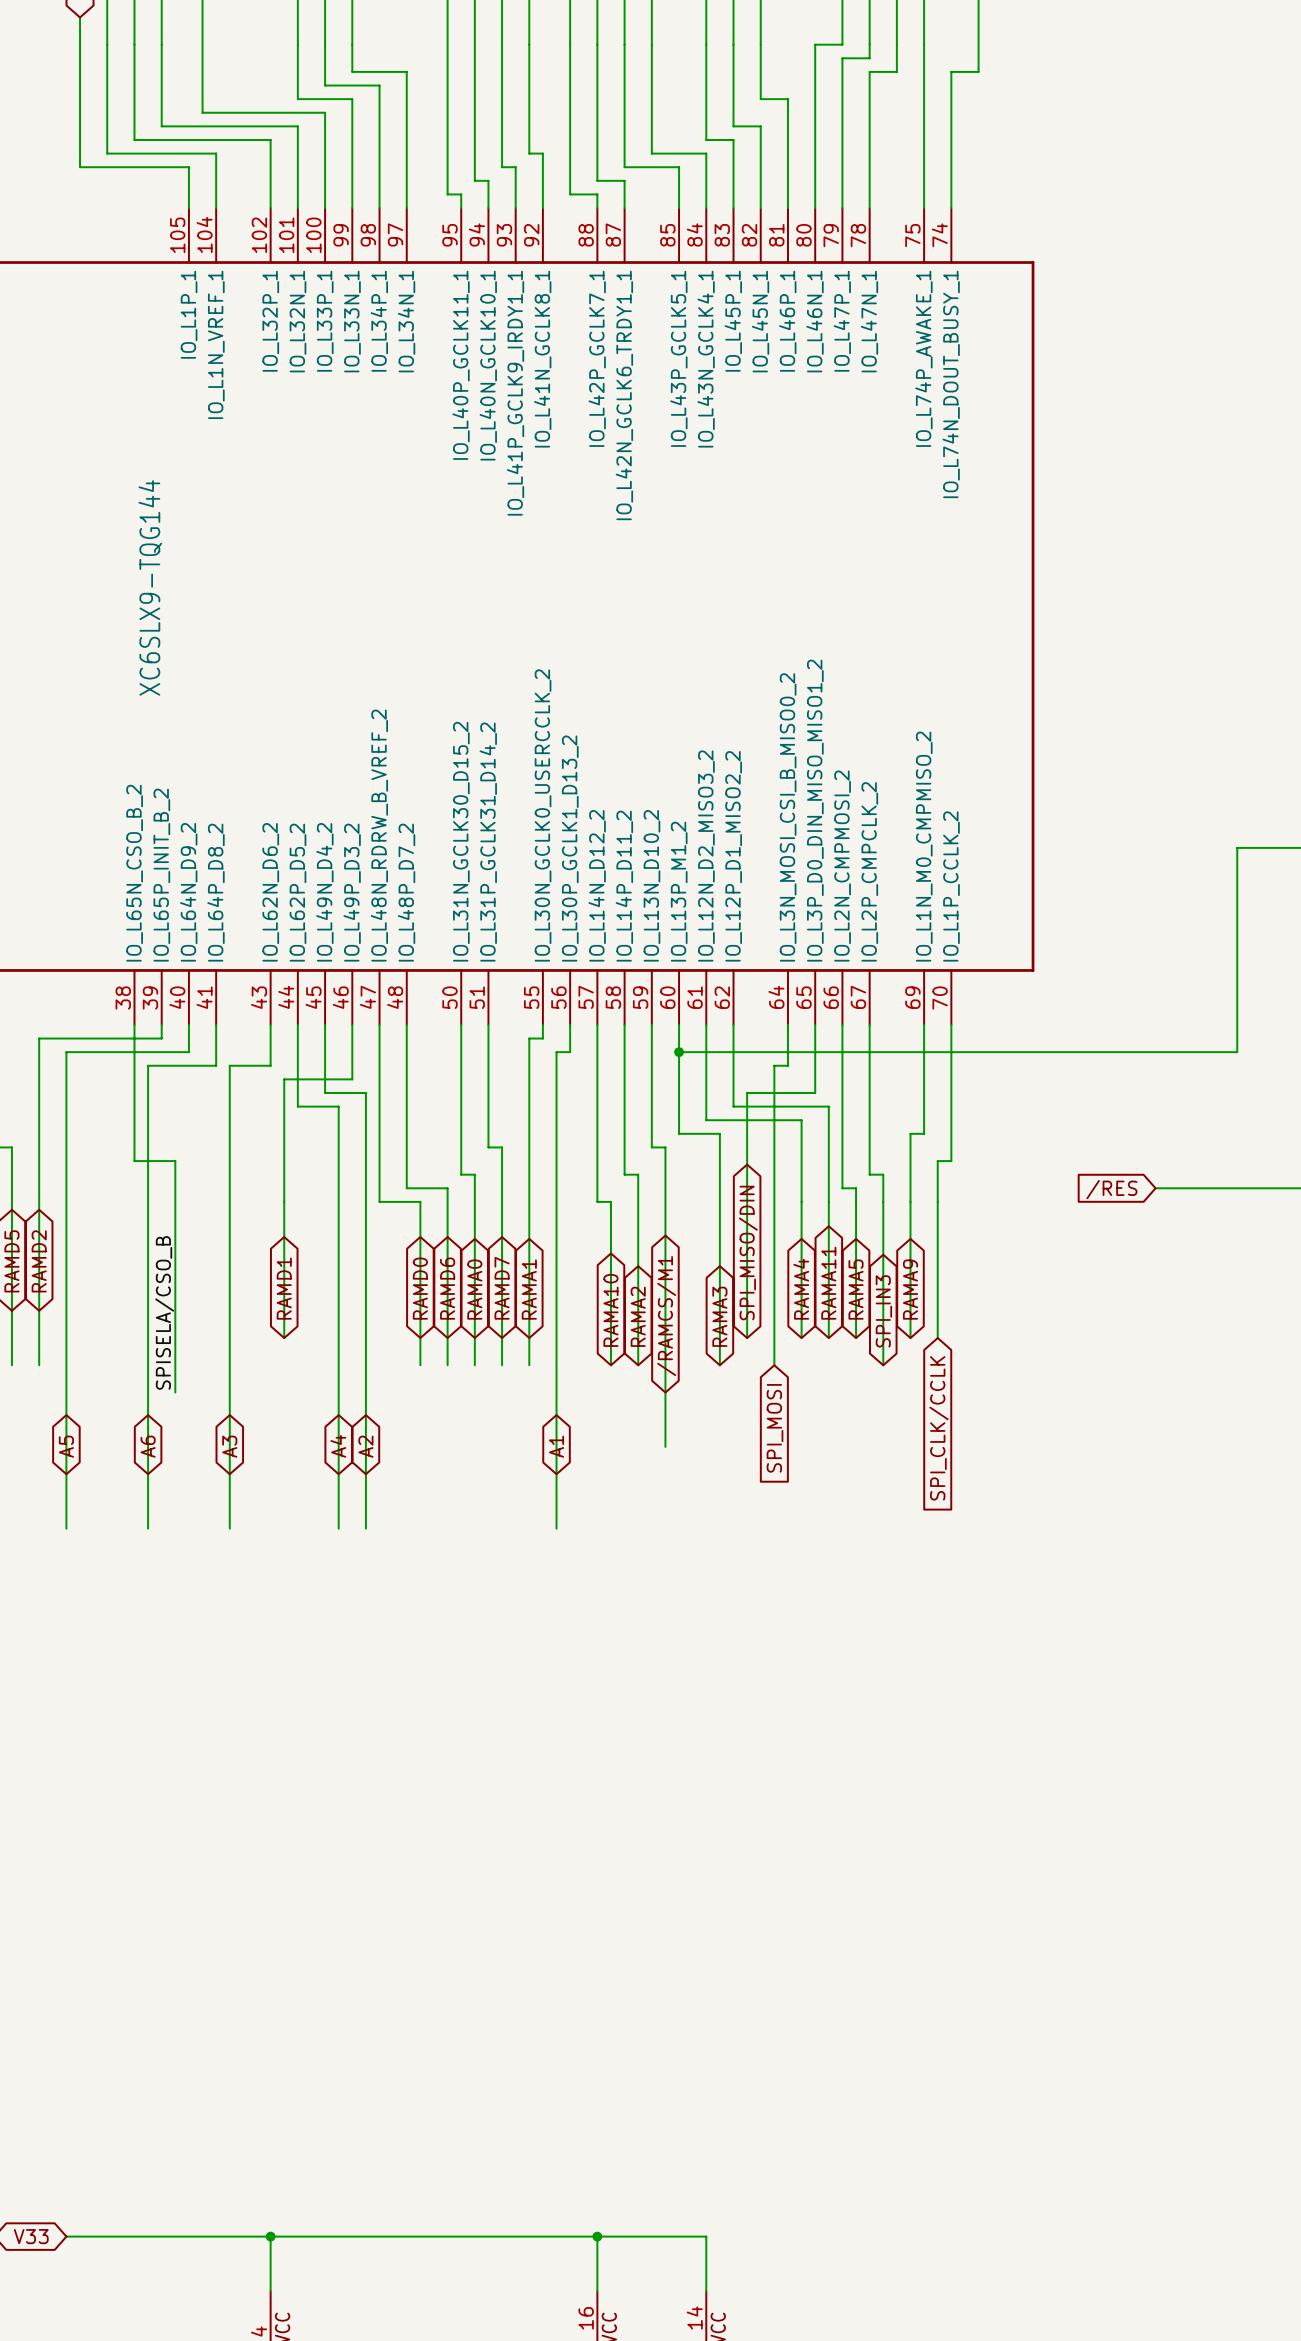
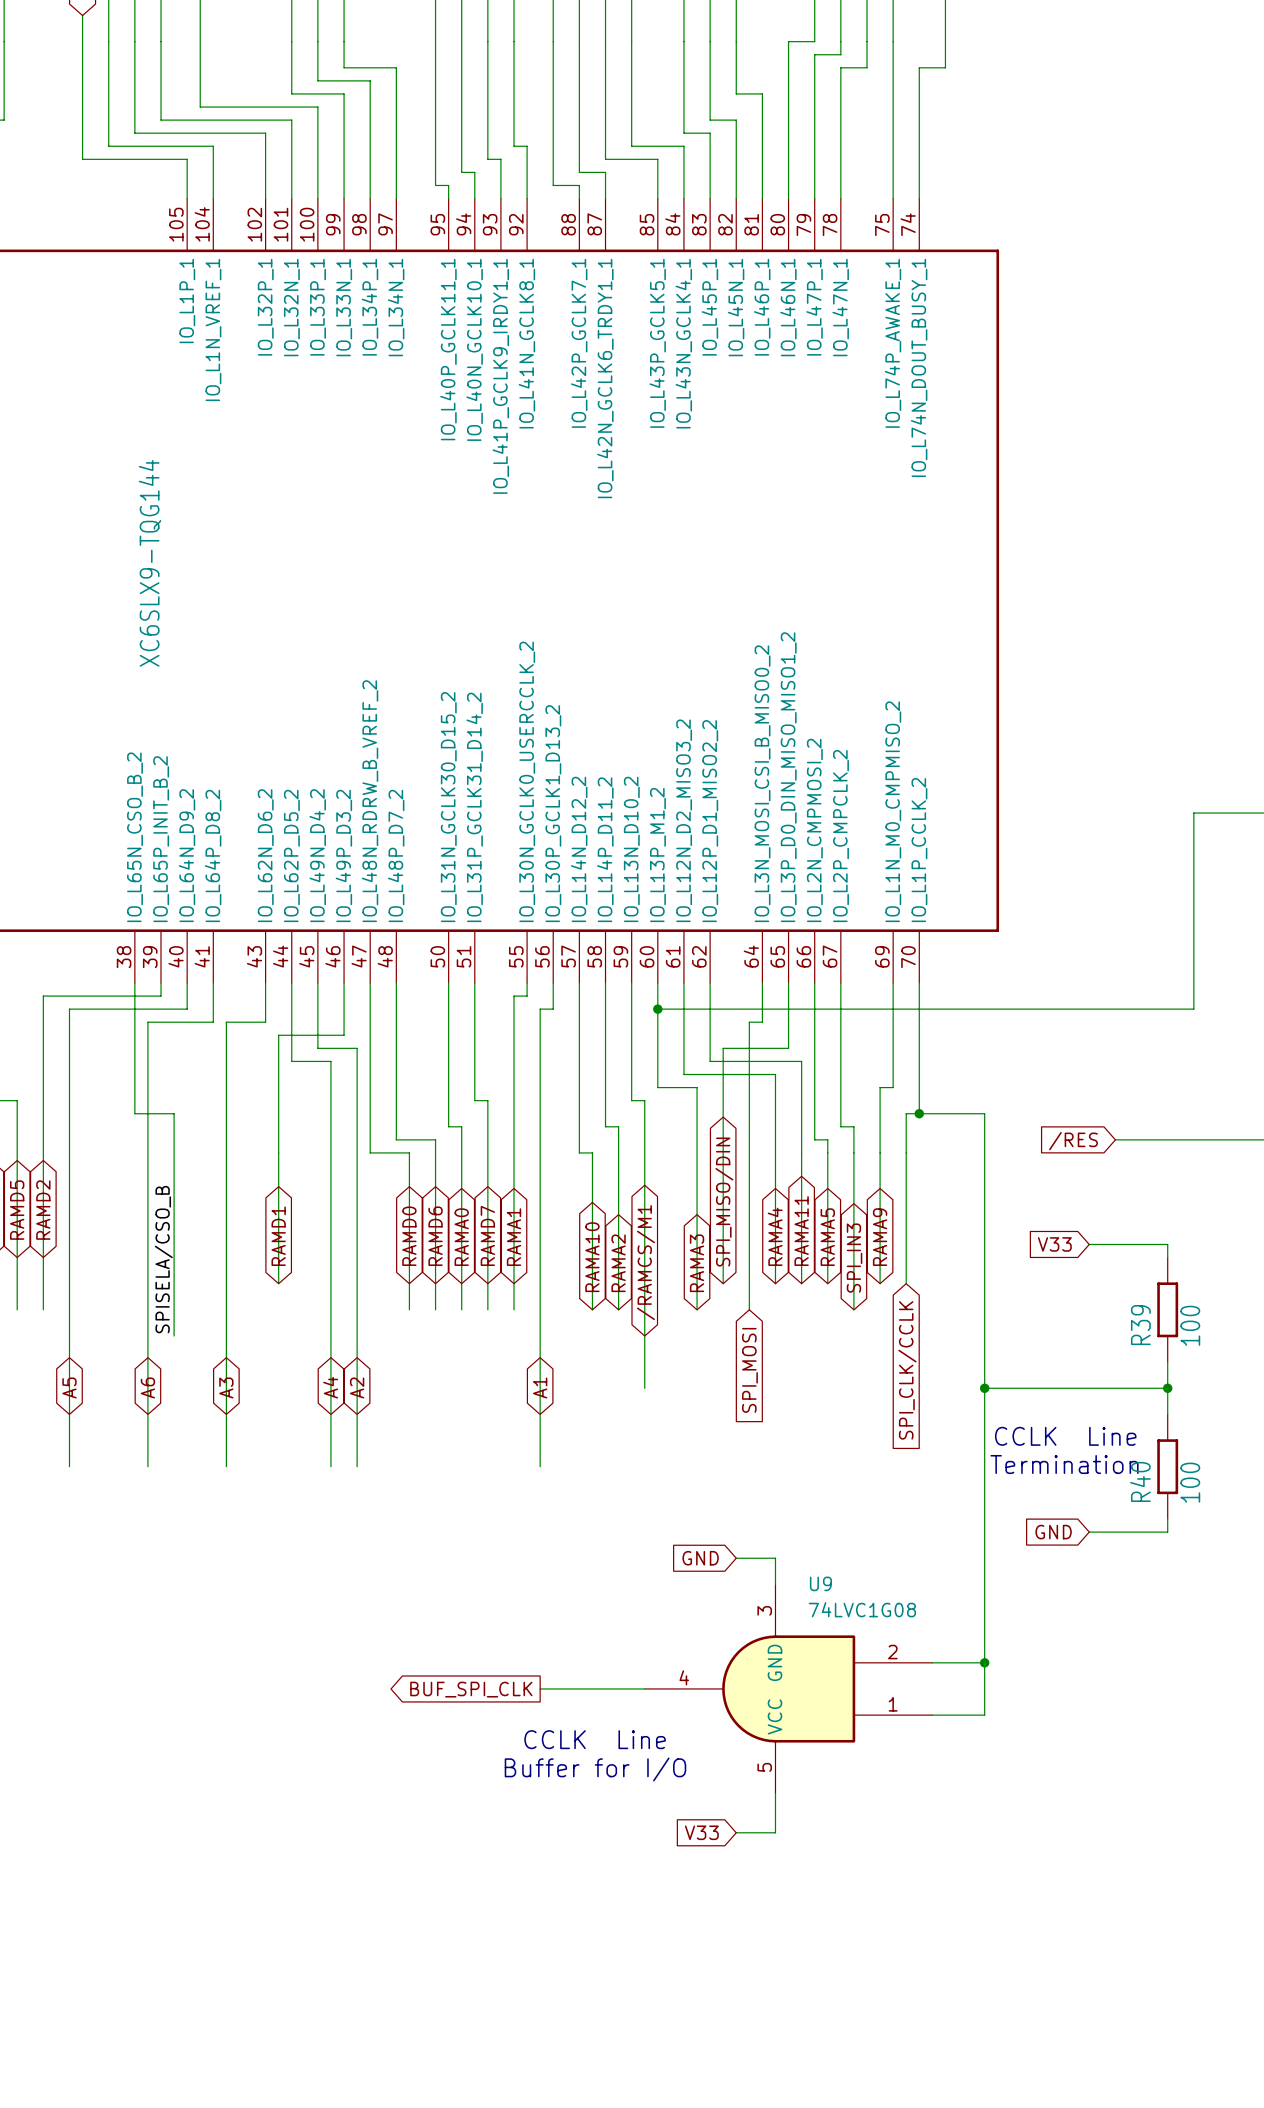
wire: none -> (919, 1113) (984, 1113) (984, 1715) (932, 1715)
junction: none -> (919, 1113)
global label: none -> V33 (1054, 1244)
wire: none -> (1089, 1244) (1167, 1244) (1167, 1257)
R39: none -> 100 (1167, 1309)
wire: none -> (1167, 1362) (1167, 1414)
wire: none -> (984, 1388) (1167, 1388)
junction: none -> (984, 1388)
junction: none -> (1167, 1388)
text: none -> CCLK Line (1065, 1436)
text: none -> Termination (1064, 1464)
R40: none -> 100 (1167, 1466)
wire: none -> (1167, 1519) (1167, 1532) (1089, 1532)
global label: none -> GND (1053, 1532)
global label: none -> GND (700, 1558)
wire: none -> (736, 1558) (775, 1558) (775, 1584)
wire: none -> (932, 1662) (984, 1662)
junction: none -> (984, 1662)
global label: none -> BUF_SPI_CLK (471, 1689)
wire: none -> (540, 1688) (644, 1688)
U9: none -> 74LVC1G08 (788, 1688)
text: none -> CCLK Line (595, 1739)
text: none -> Buffer for I/O (595, 1769)
wire: none -> (775, 1793) (775, 1832) (736, 1832)
global label: none -> V33 (701, 1832)

